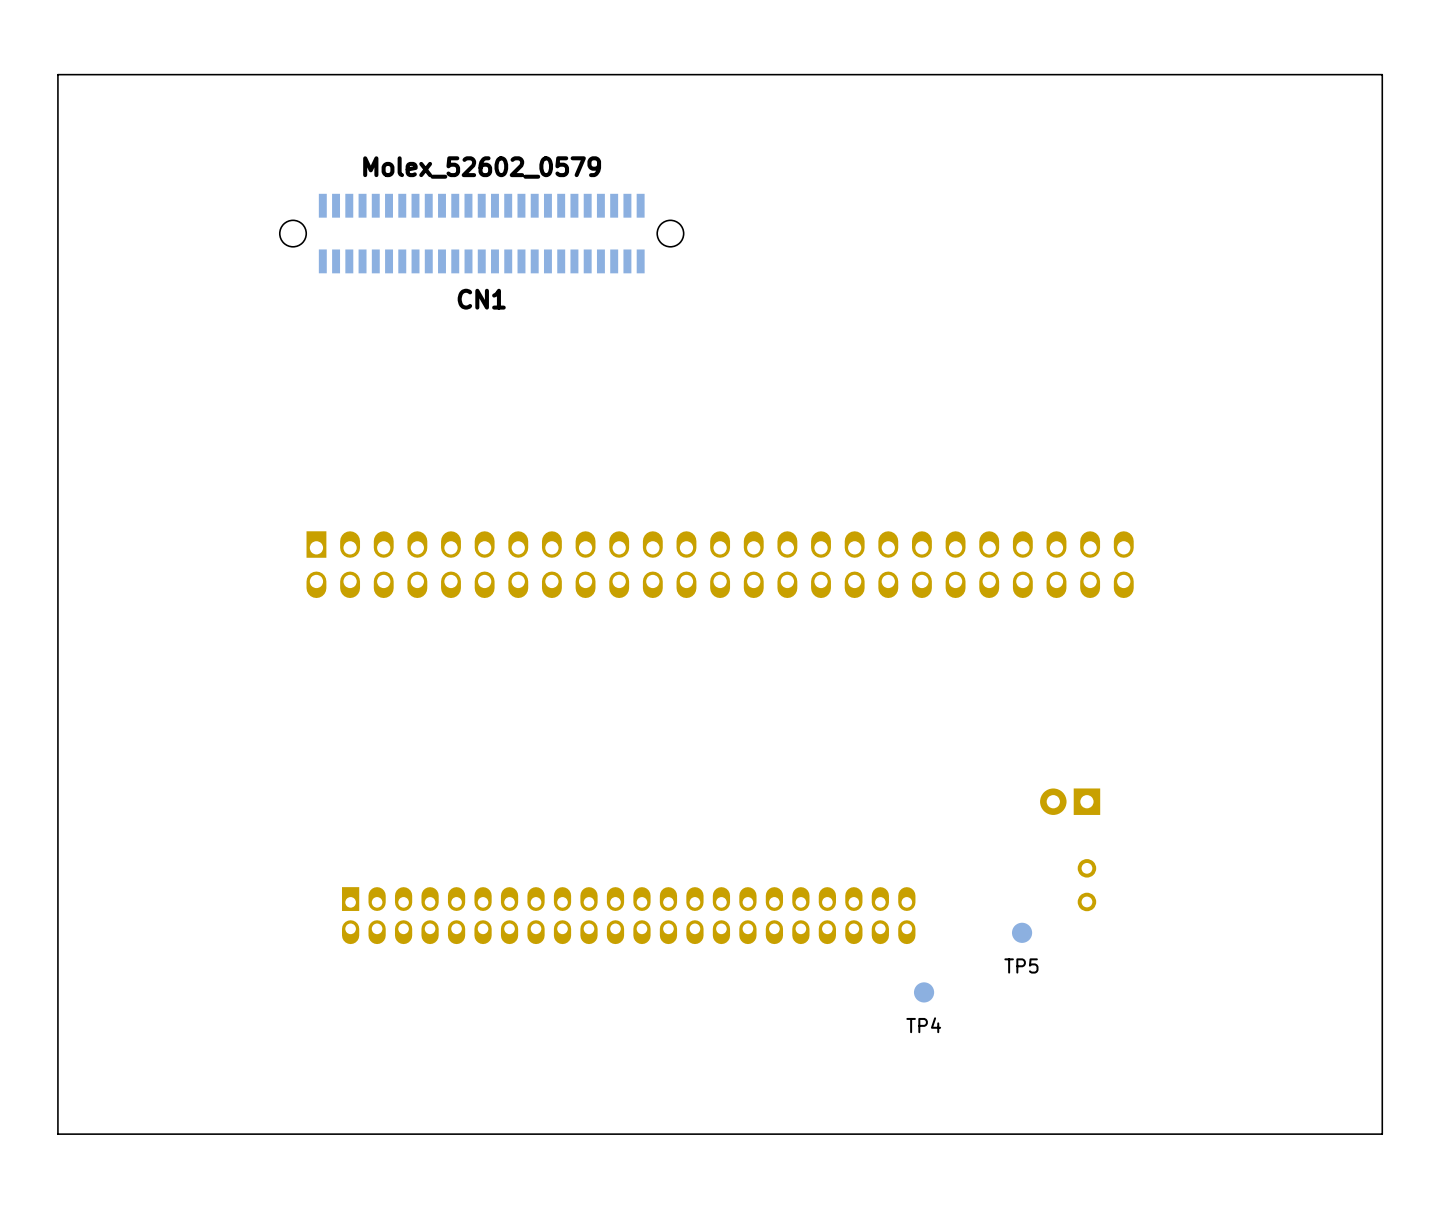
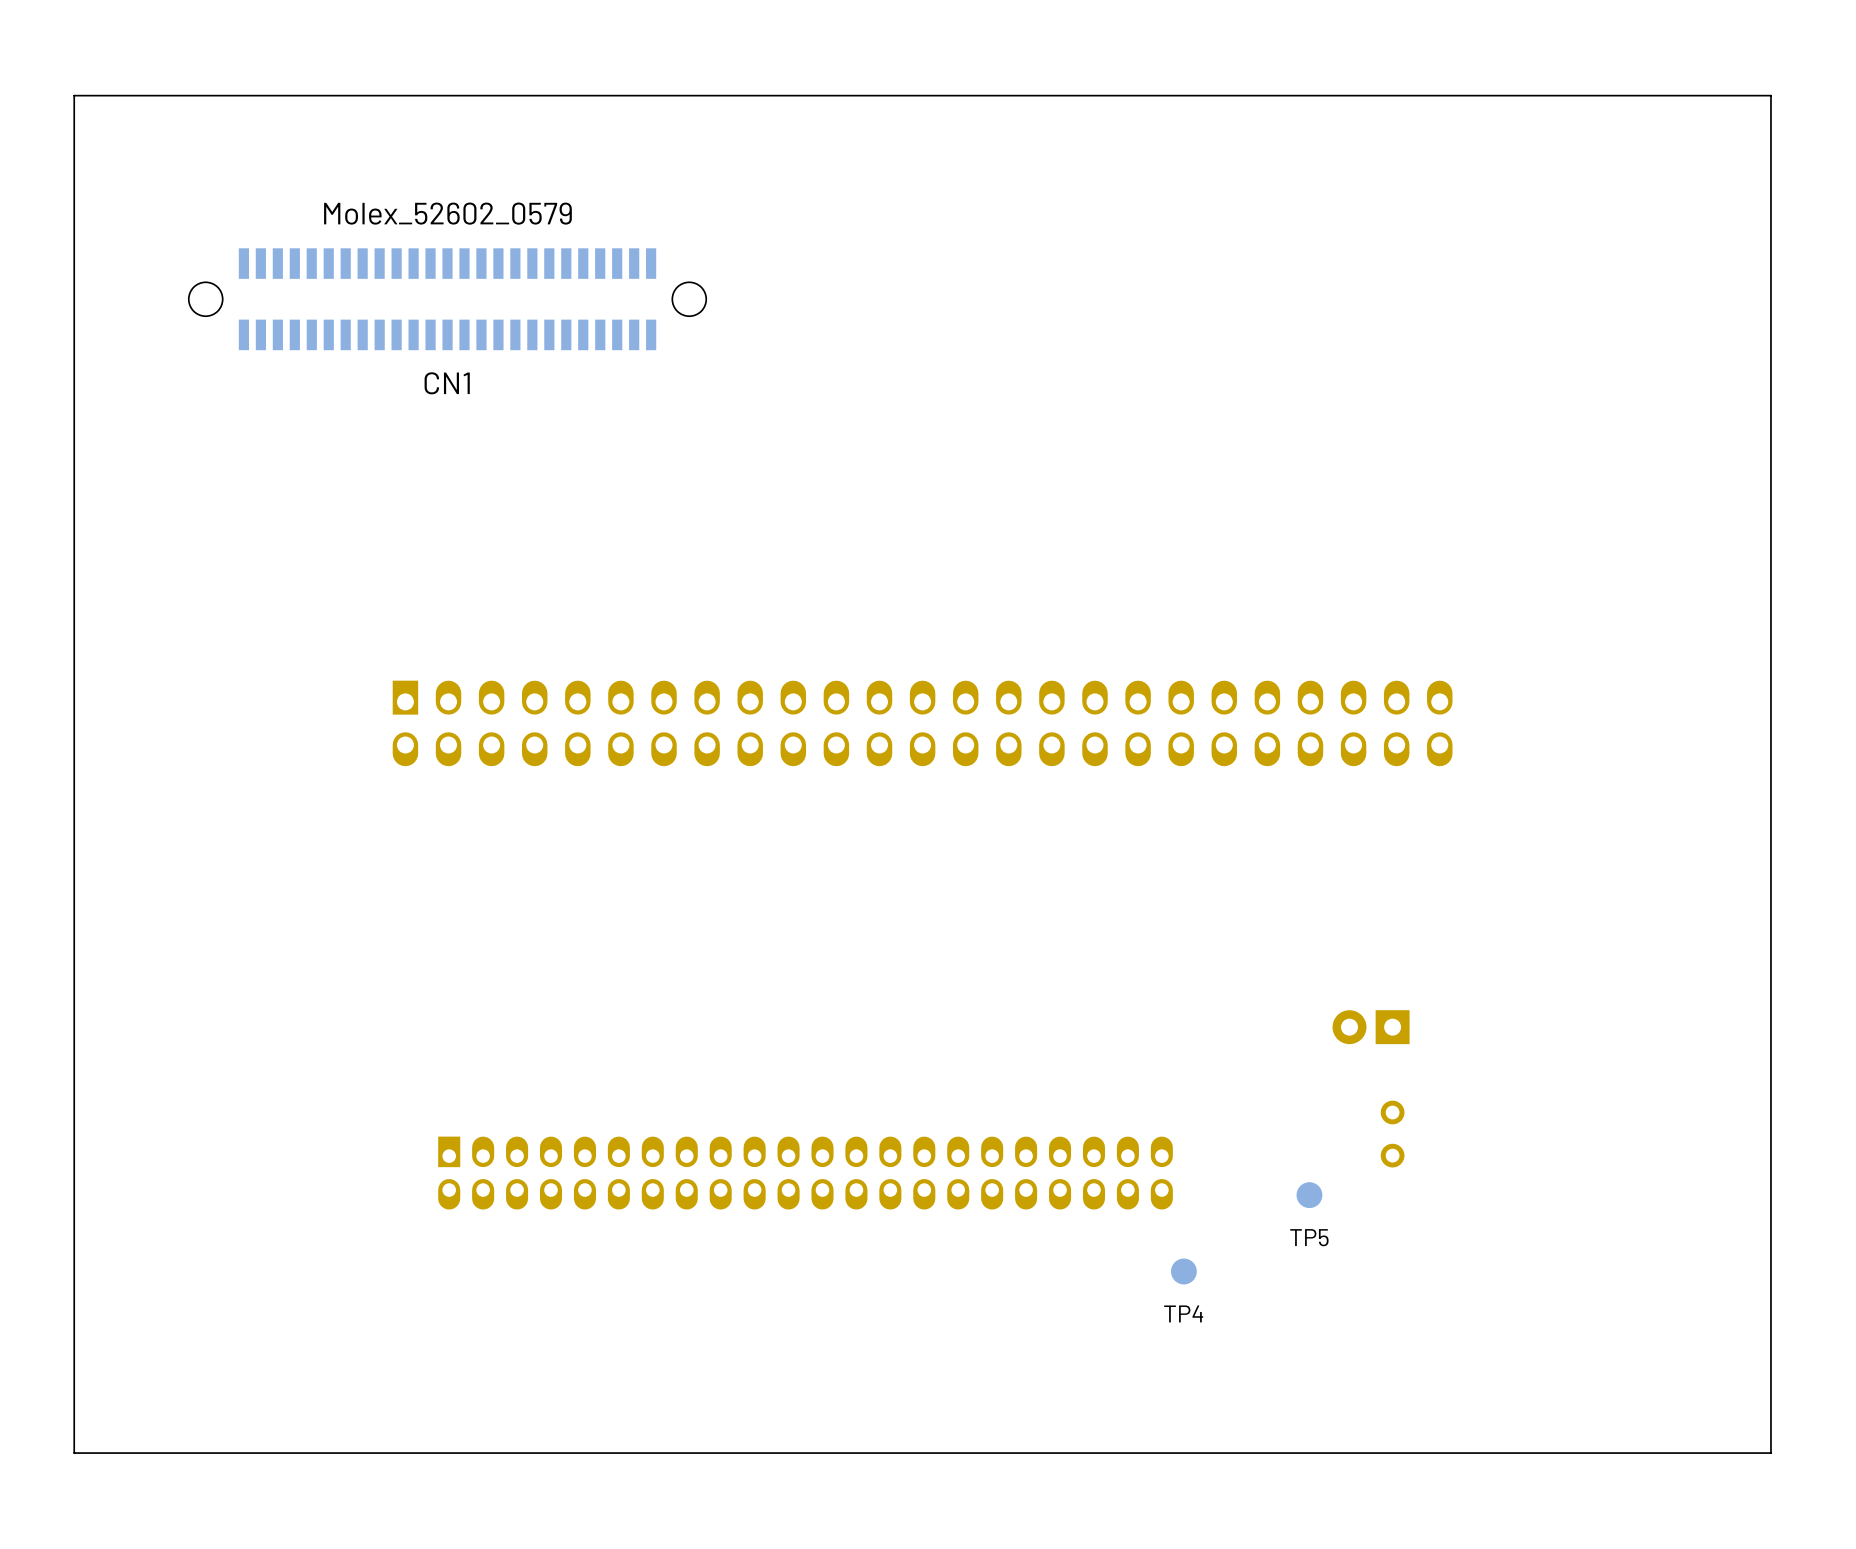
CN1 position: (481, 233) -> (447, 299)

